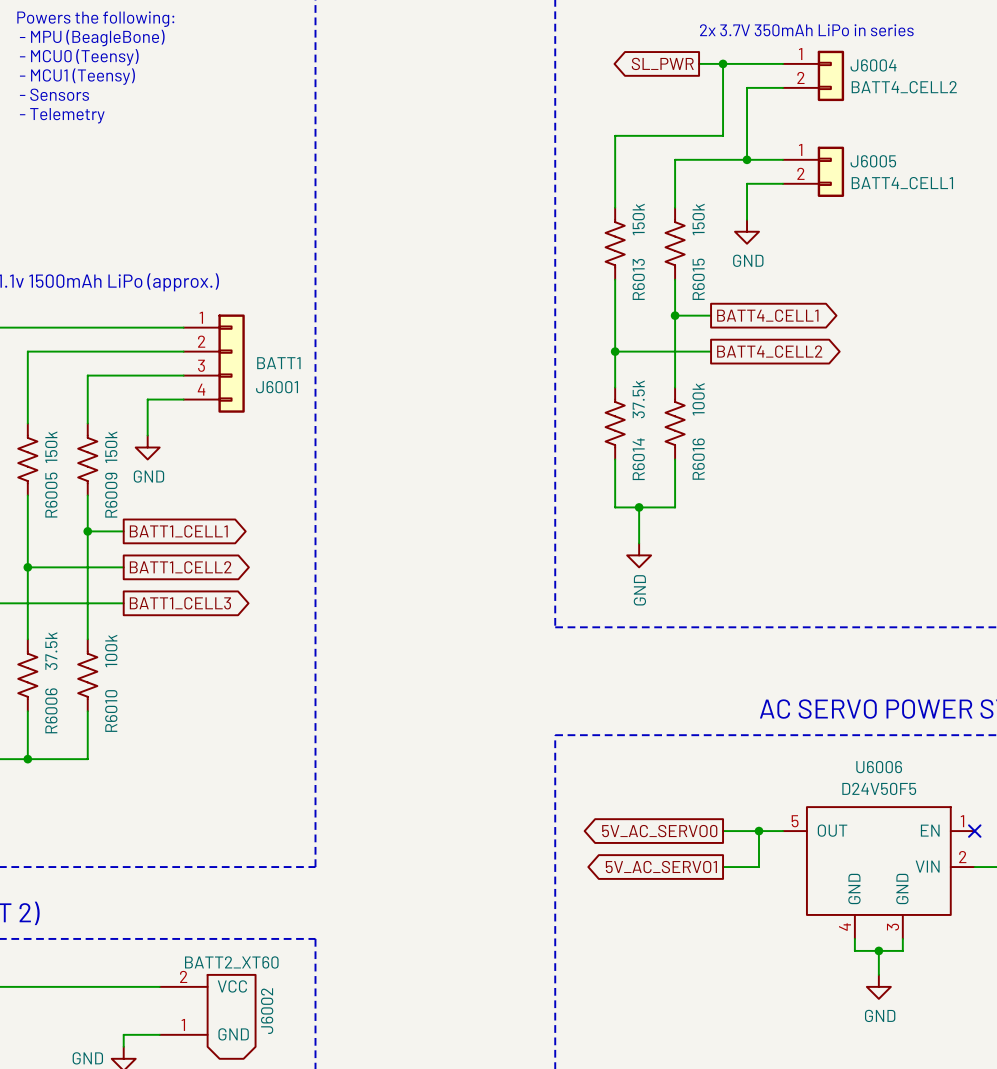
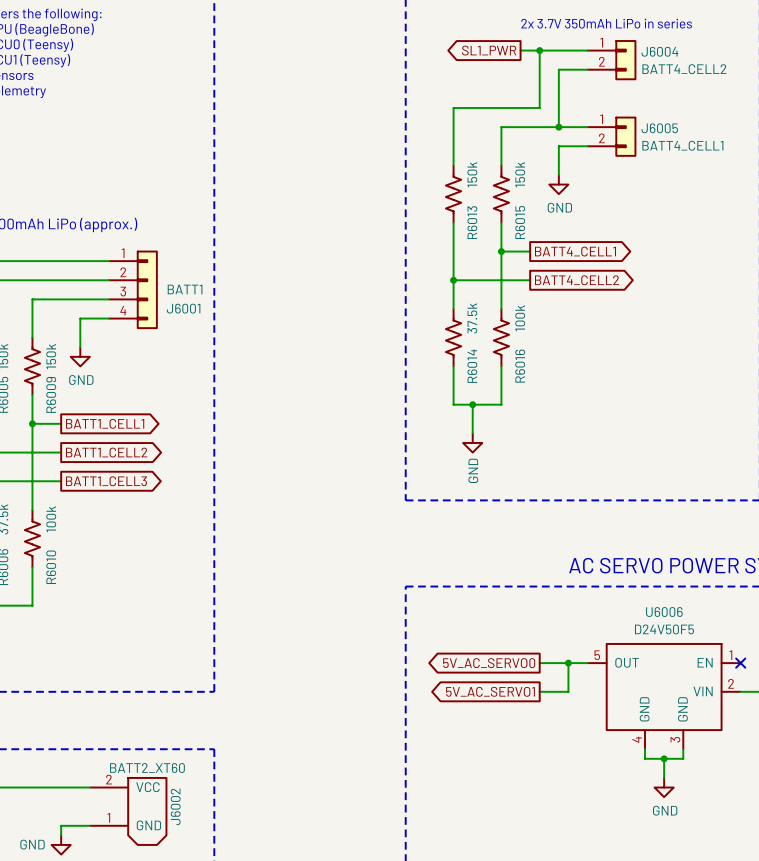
global label: SL_PWR (662, 63) -> SL1_PWR (489, 50)

